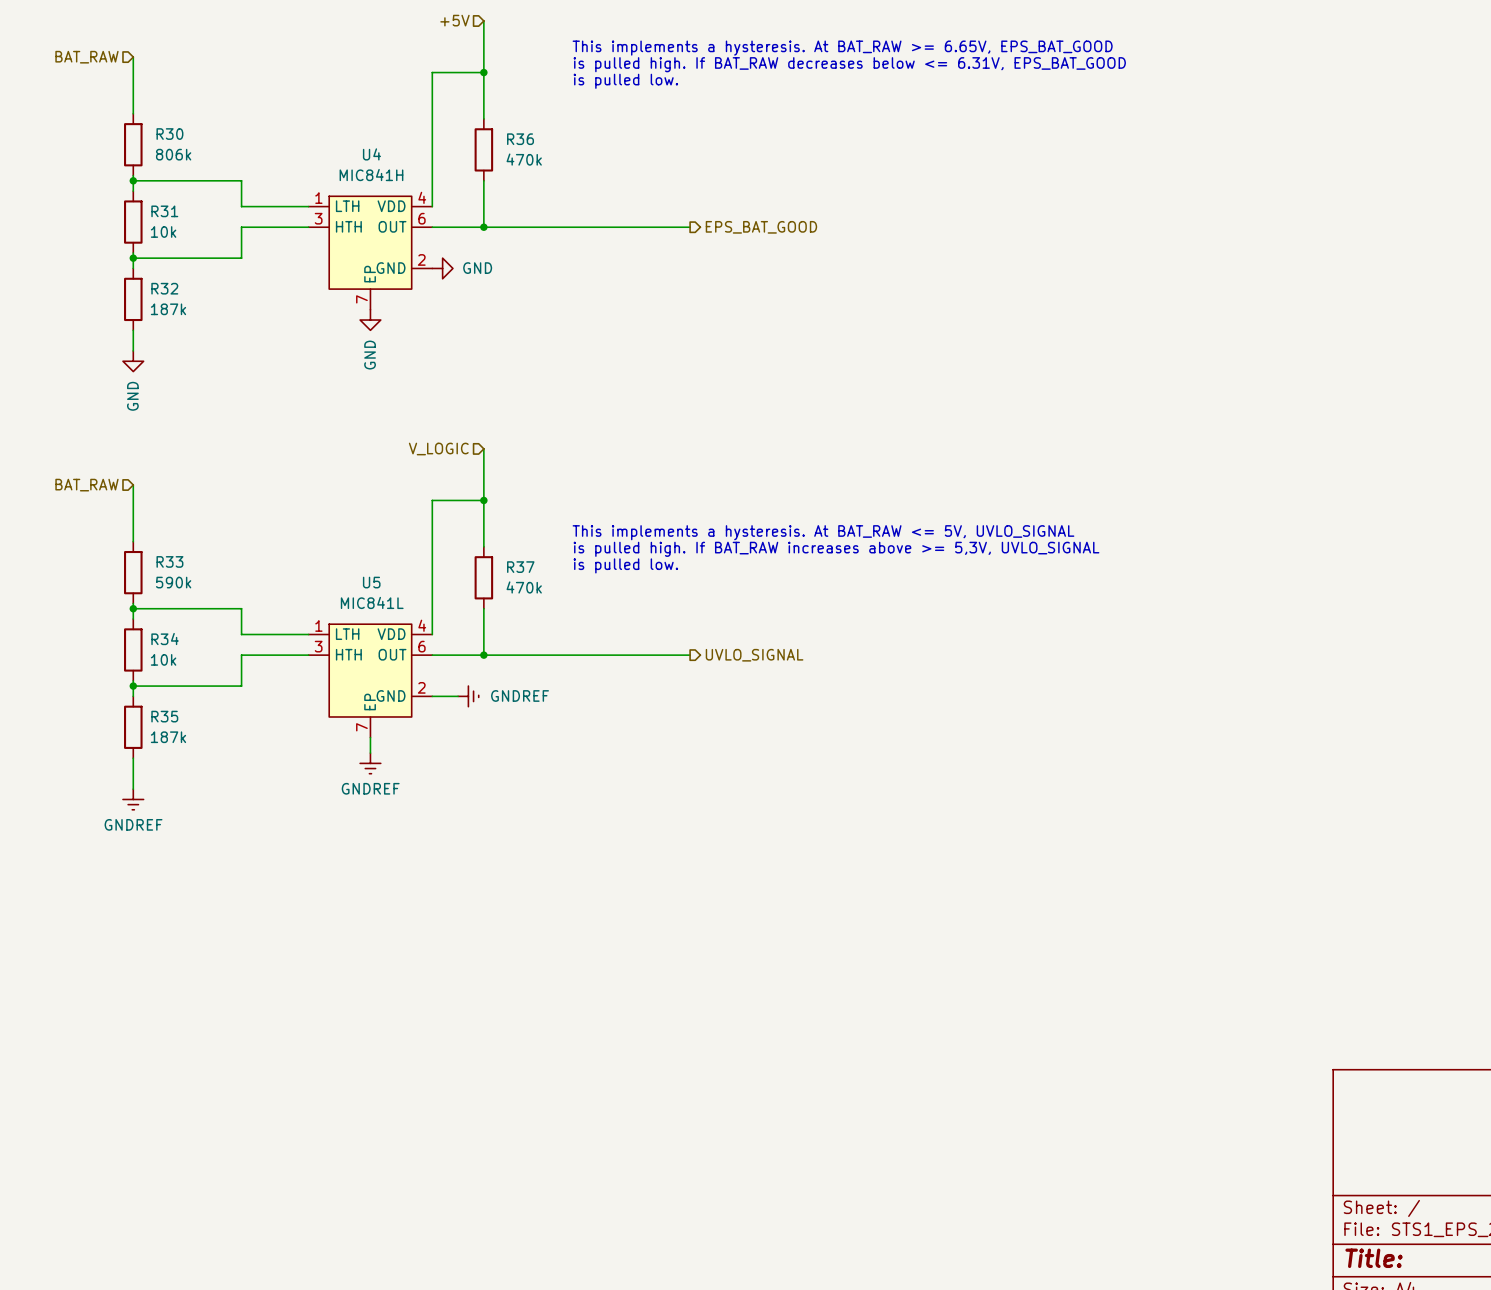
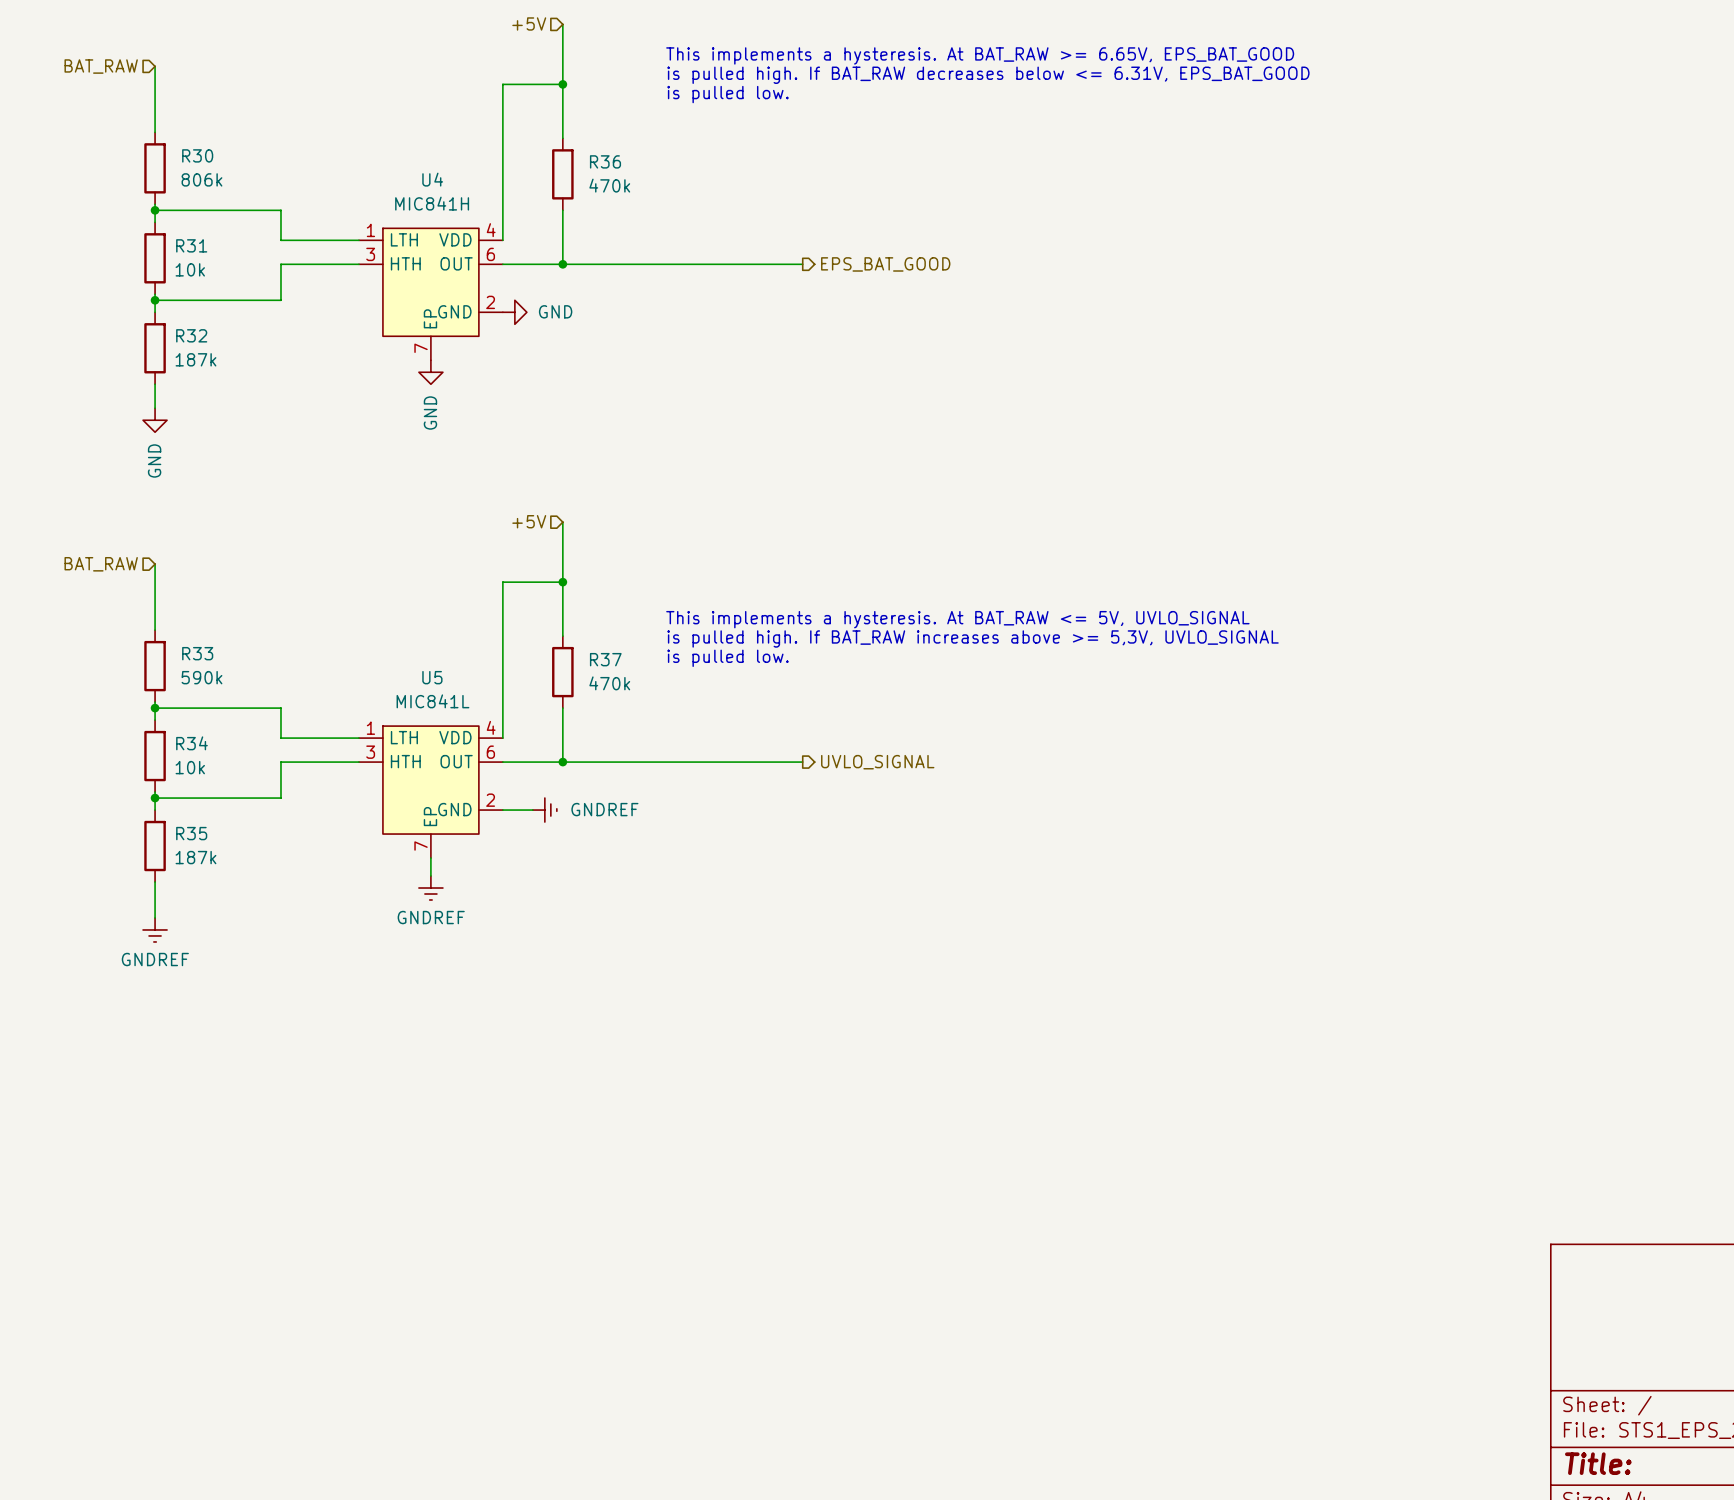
hierarchical label: V_LOGIC (438, 449) -> +5V (529, 521)

